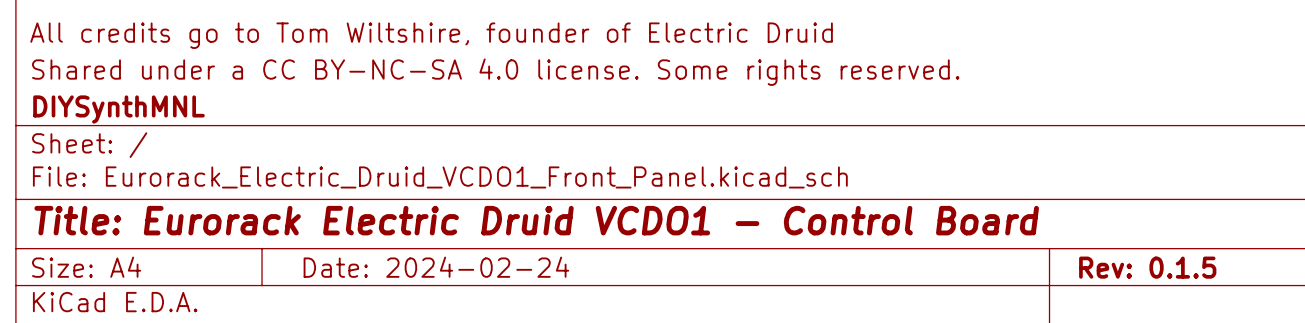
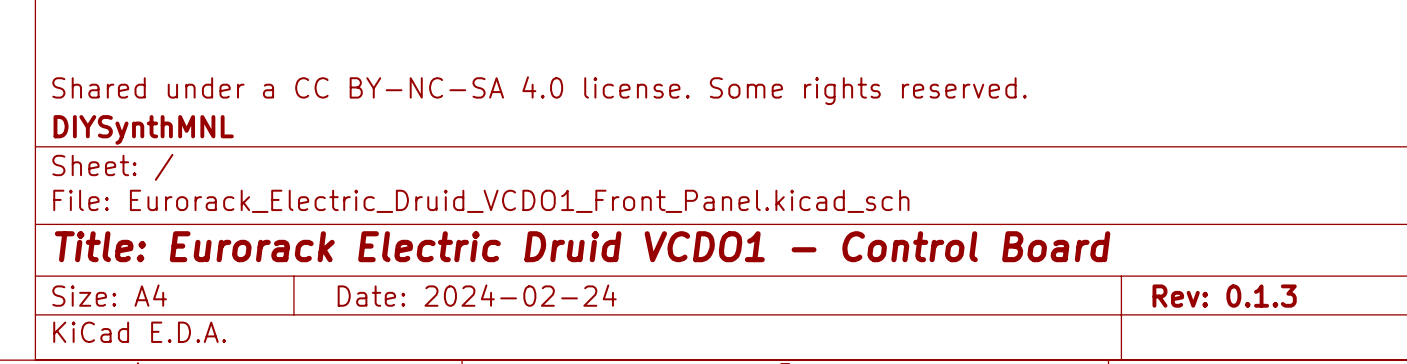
title block: All credits go to Tom Wiltshire, founder of Electric Druid (431, 35) -> none
title block: Rev: 0.1.5 (1147, 267) -> Rev: 0.1.3 (1224, 296)

